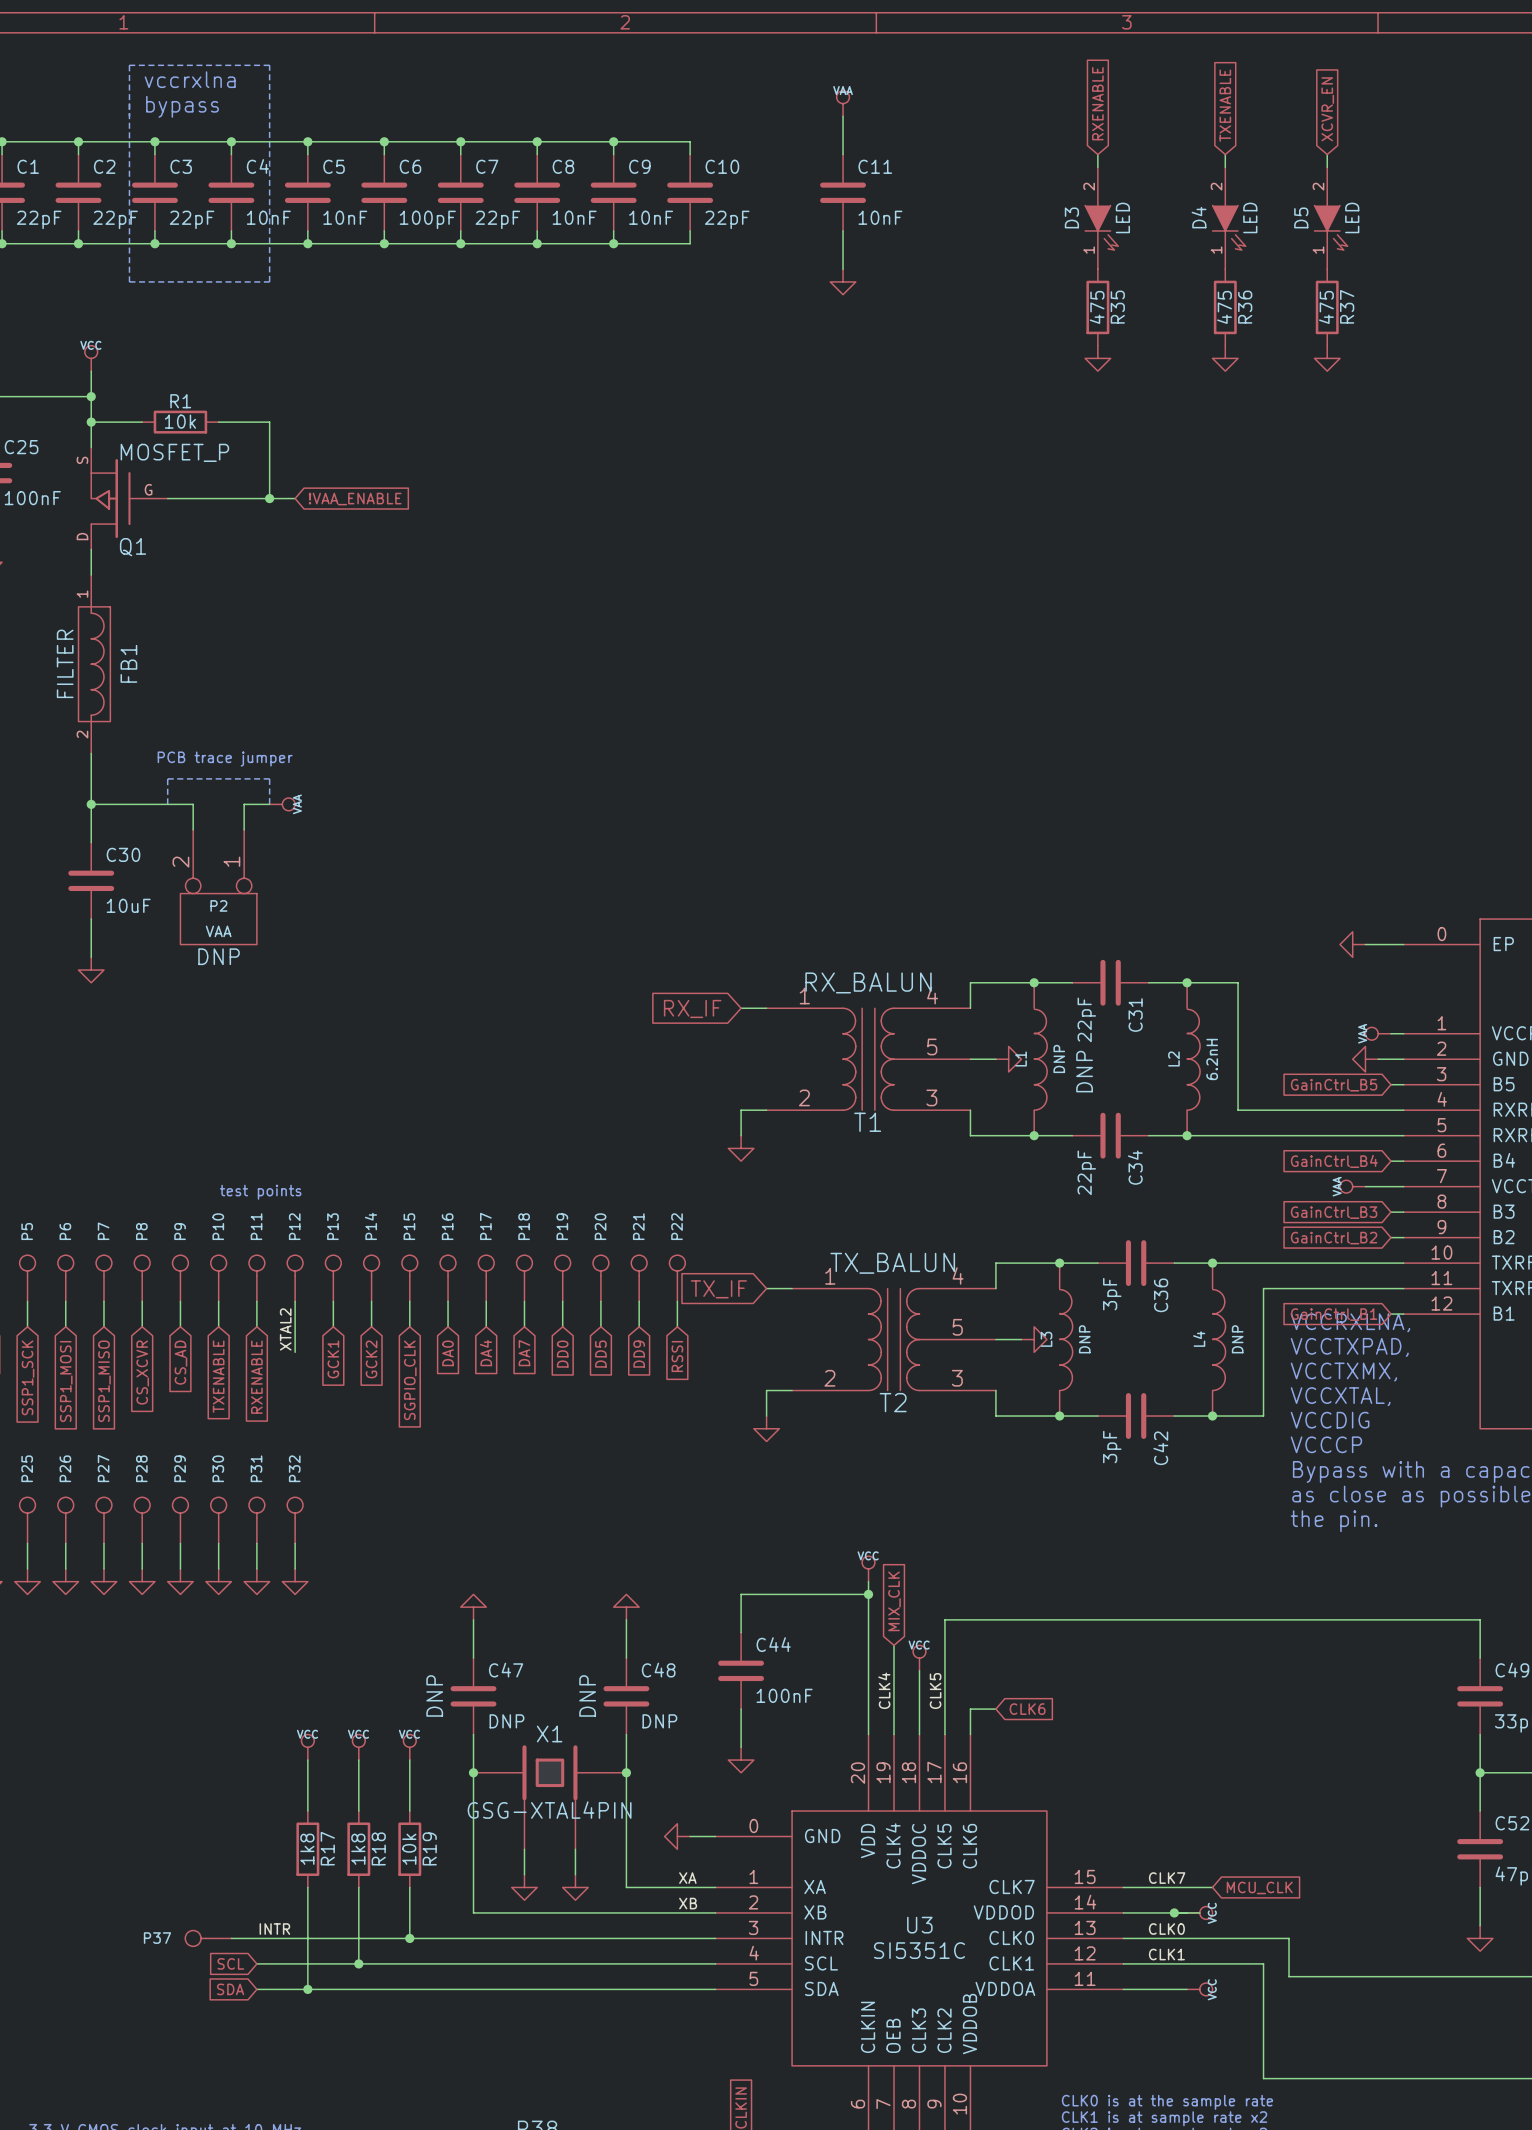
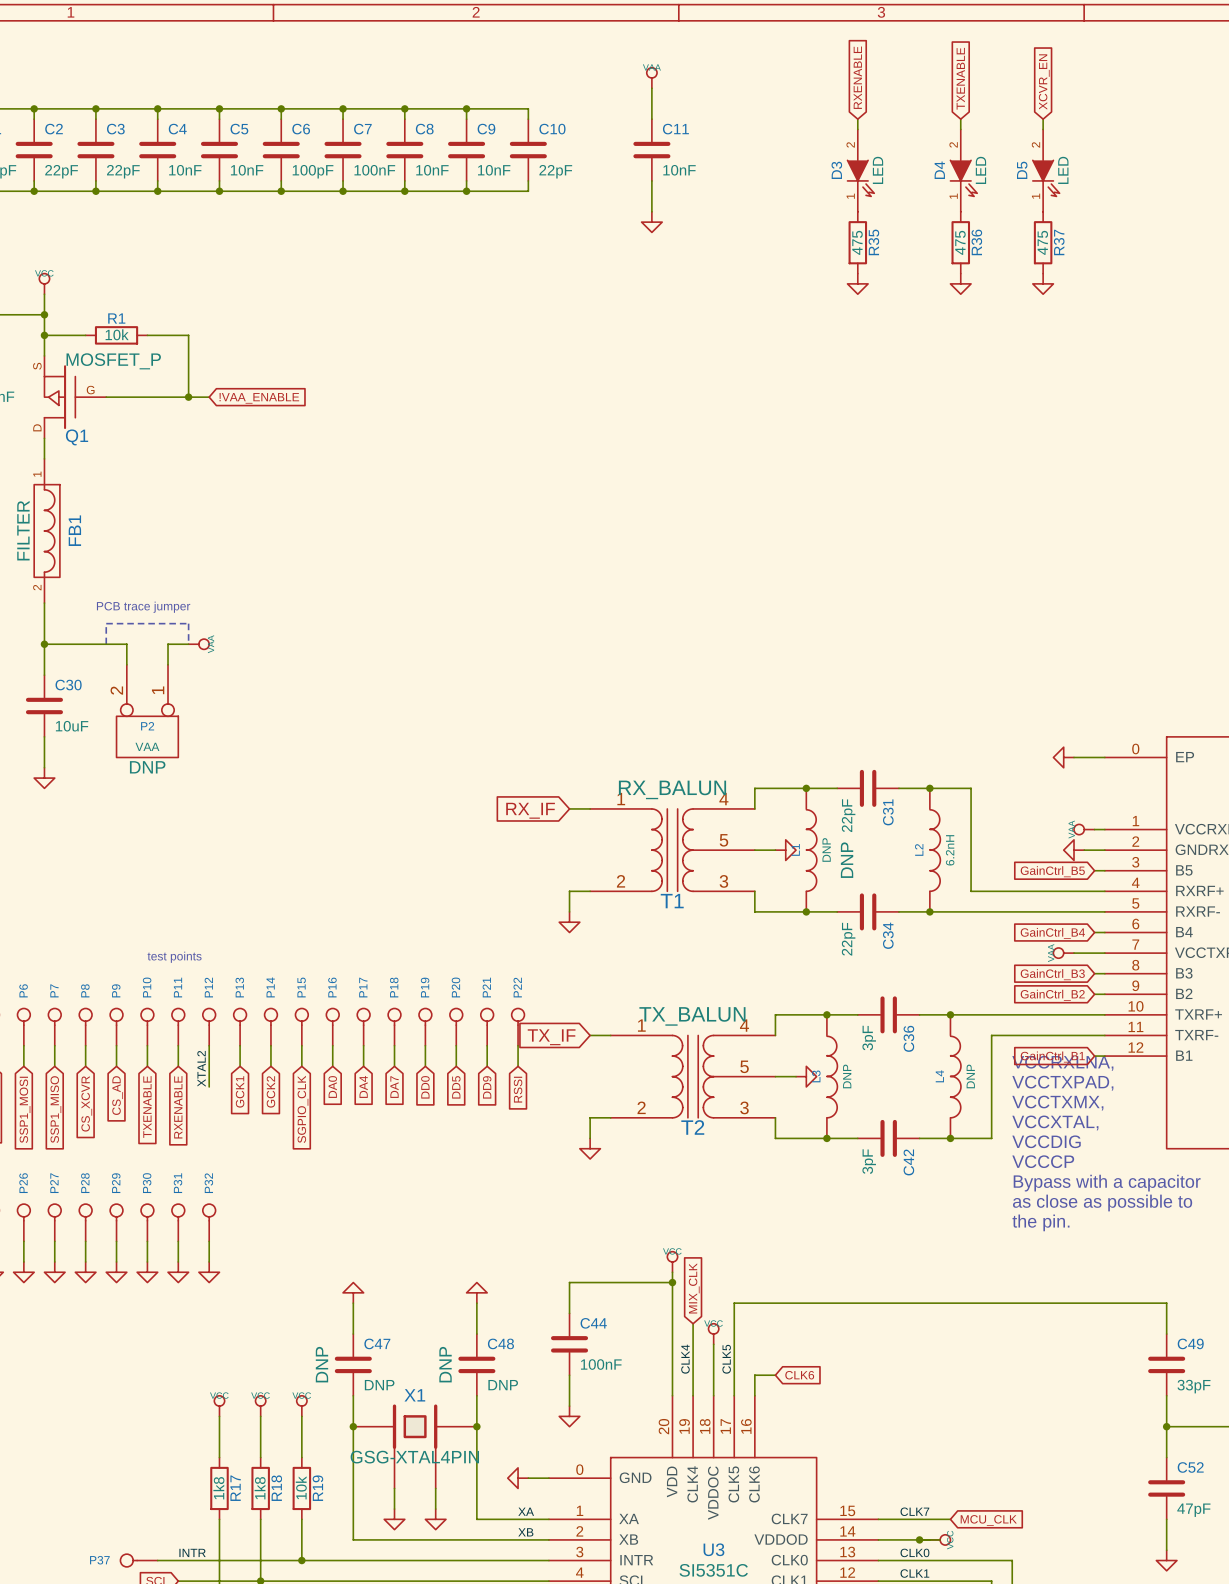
line: (129, 65) (129, 281) (269, 281) (269, 65) (129, 65) -> none
text: vccrxlna (190, 79) -> none
text: bypass (182, 106) -> none
C7 value: 22pF (497, 219) -> 100nF (374, 170)

